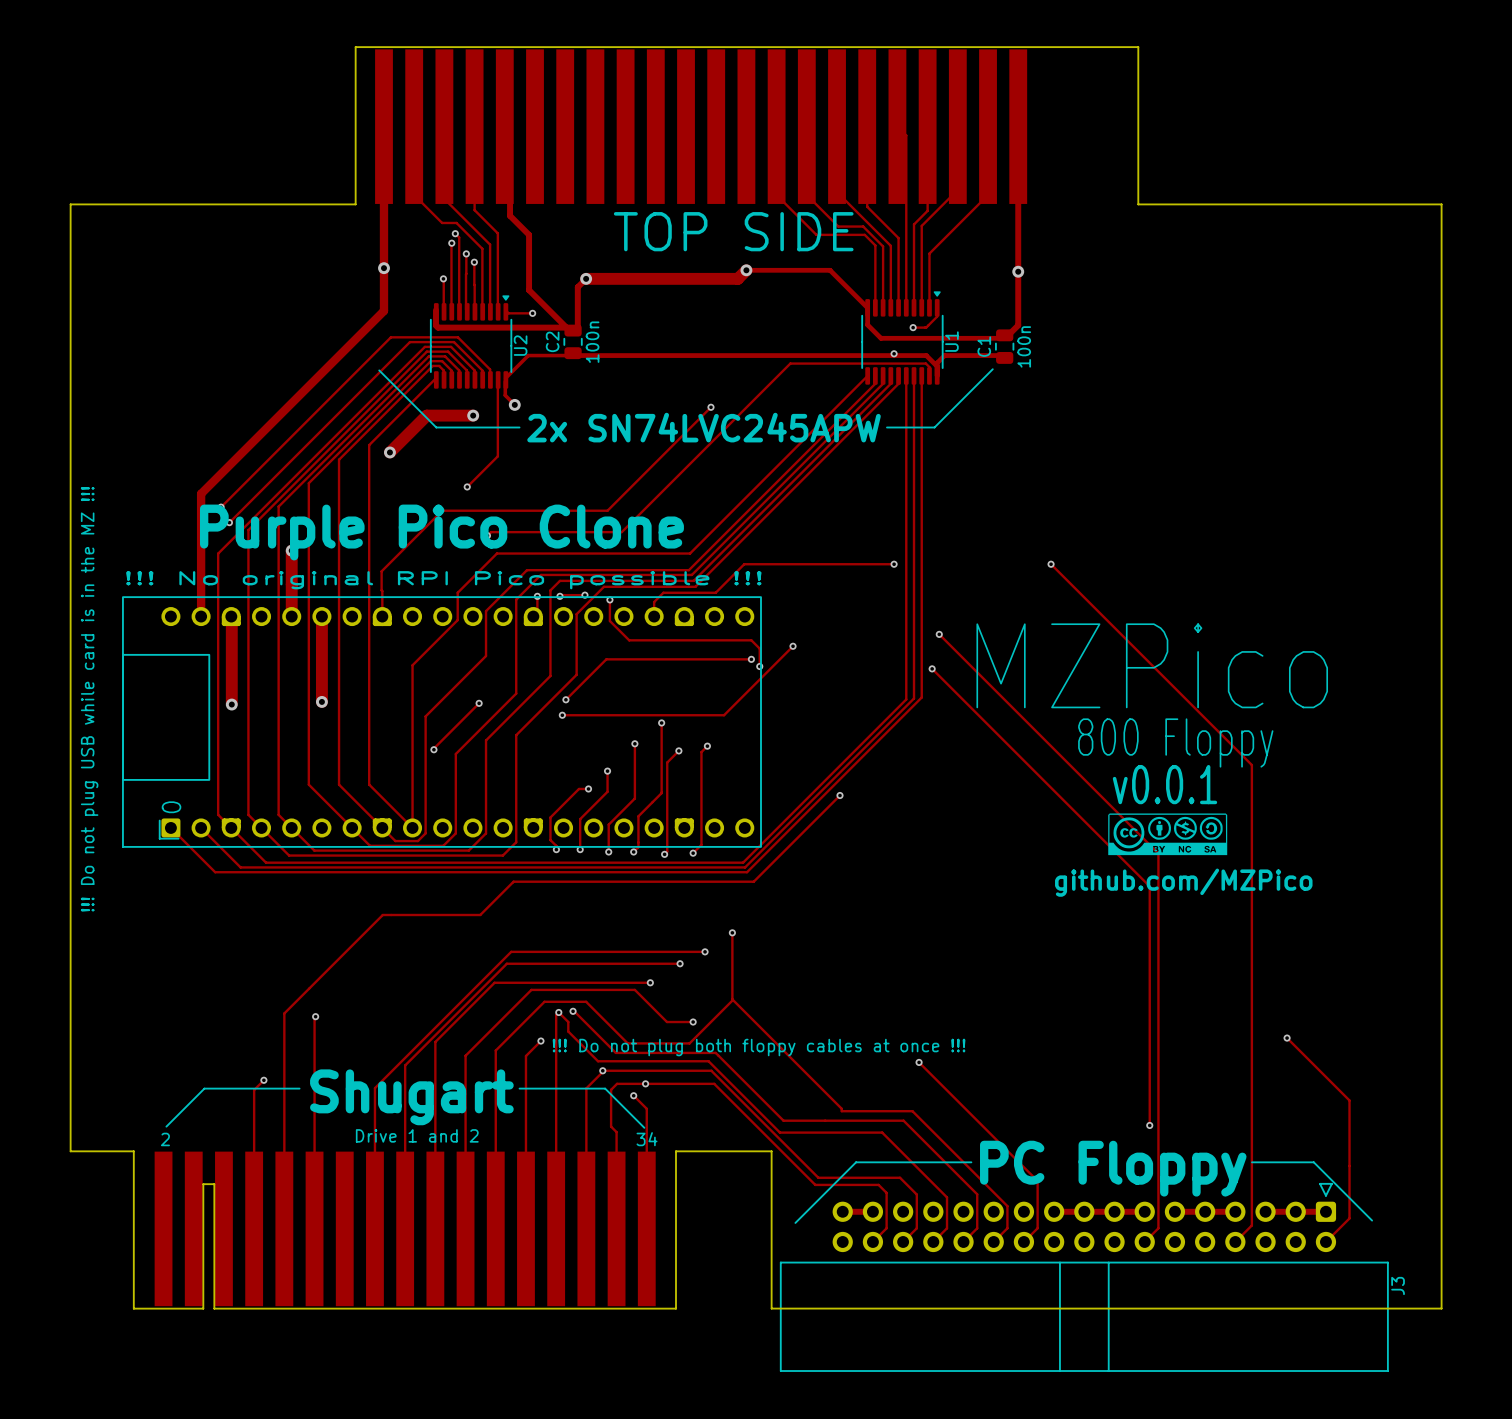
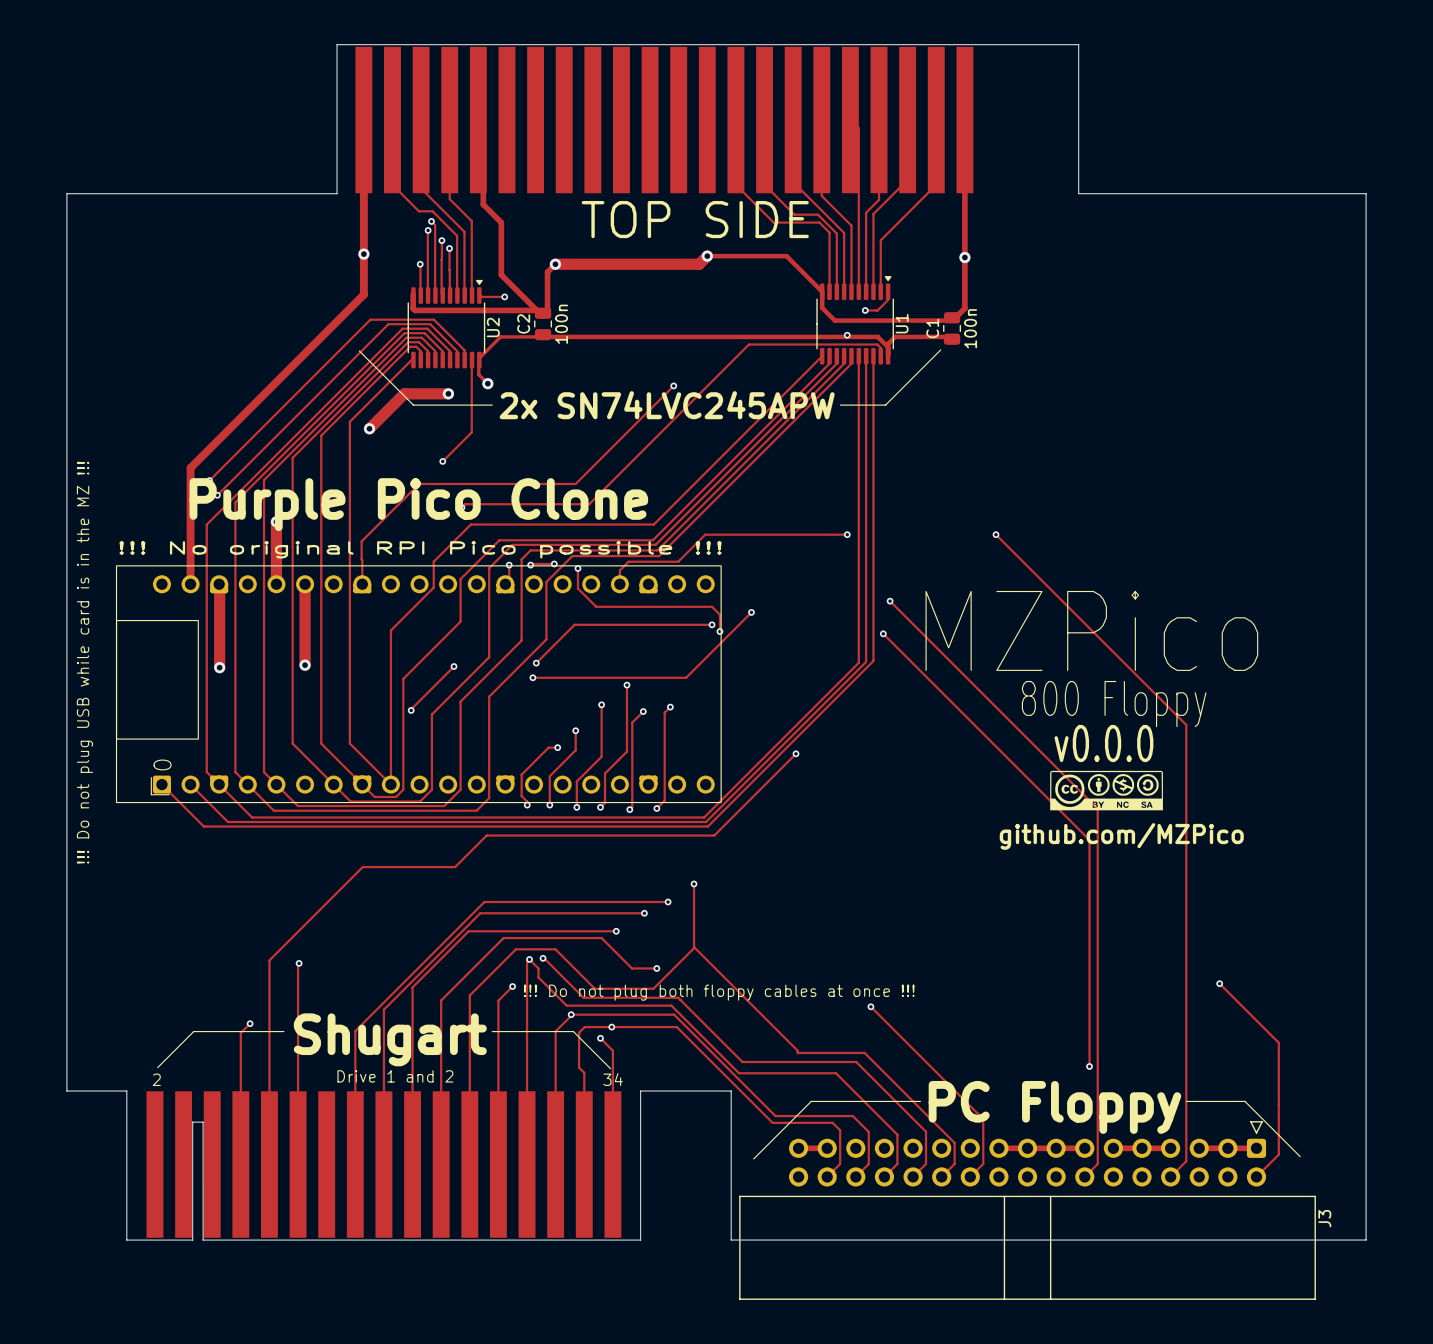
text: v0.0.1 (1164, 784) -> v0.0.0 (1103, 743)

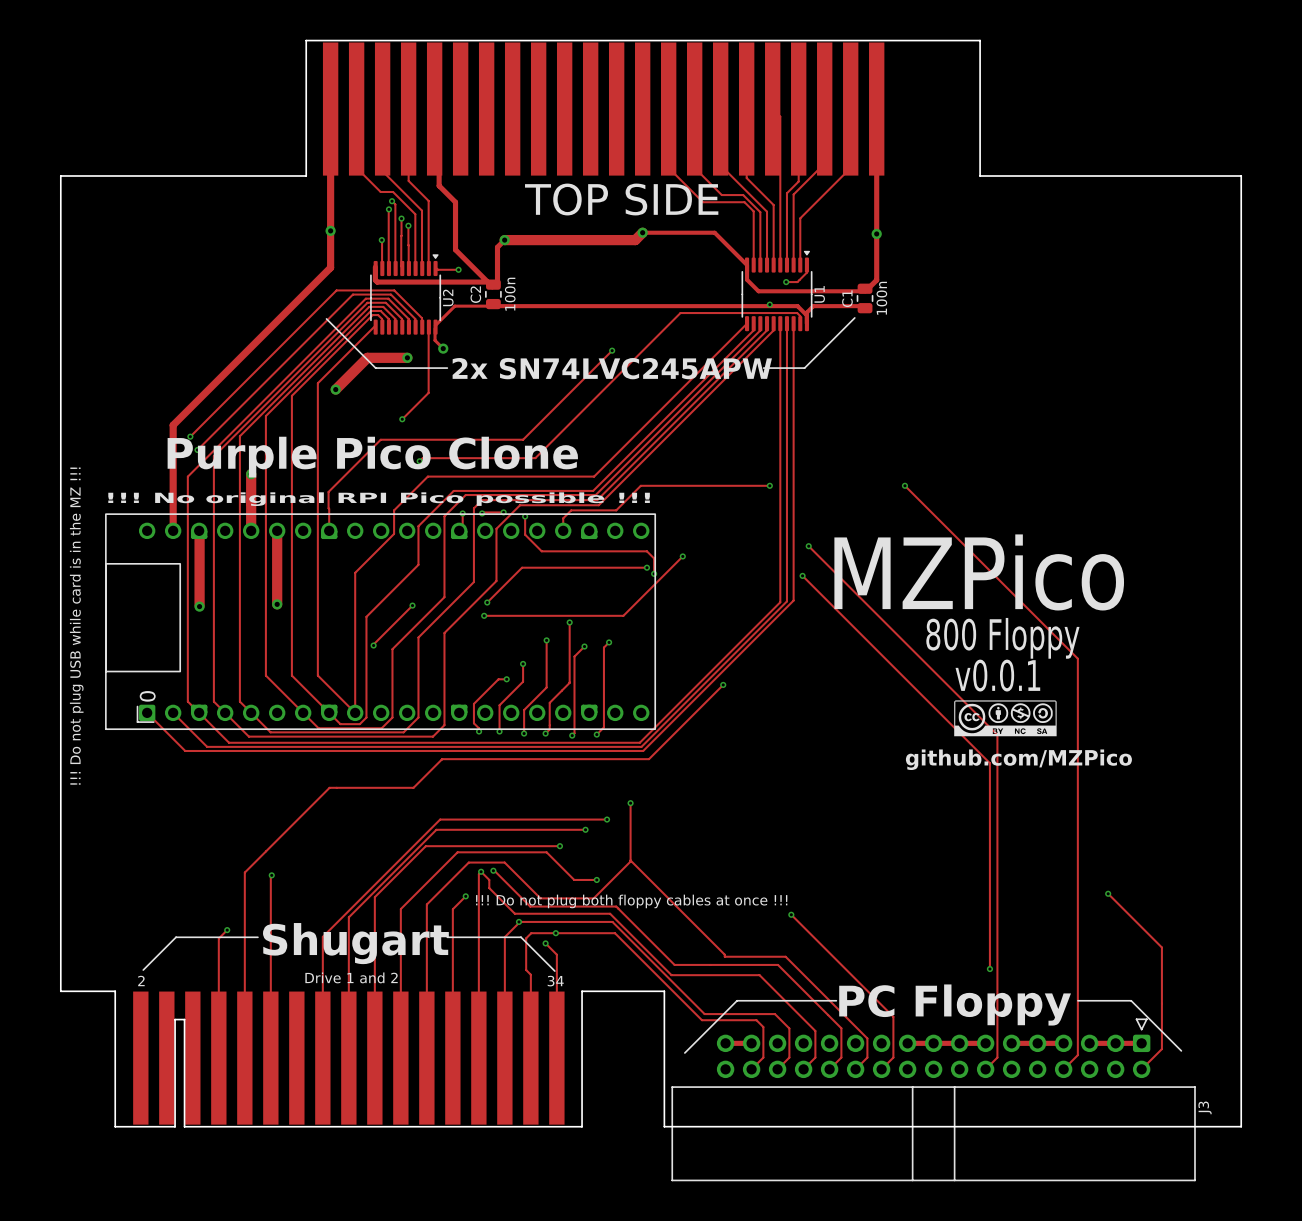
text: v0.0.0 (1103, 743) -> v0.0.1 (997, 675)

